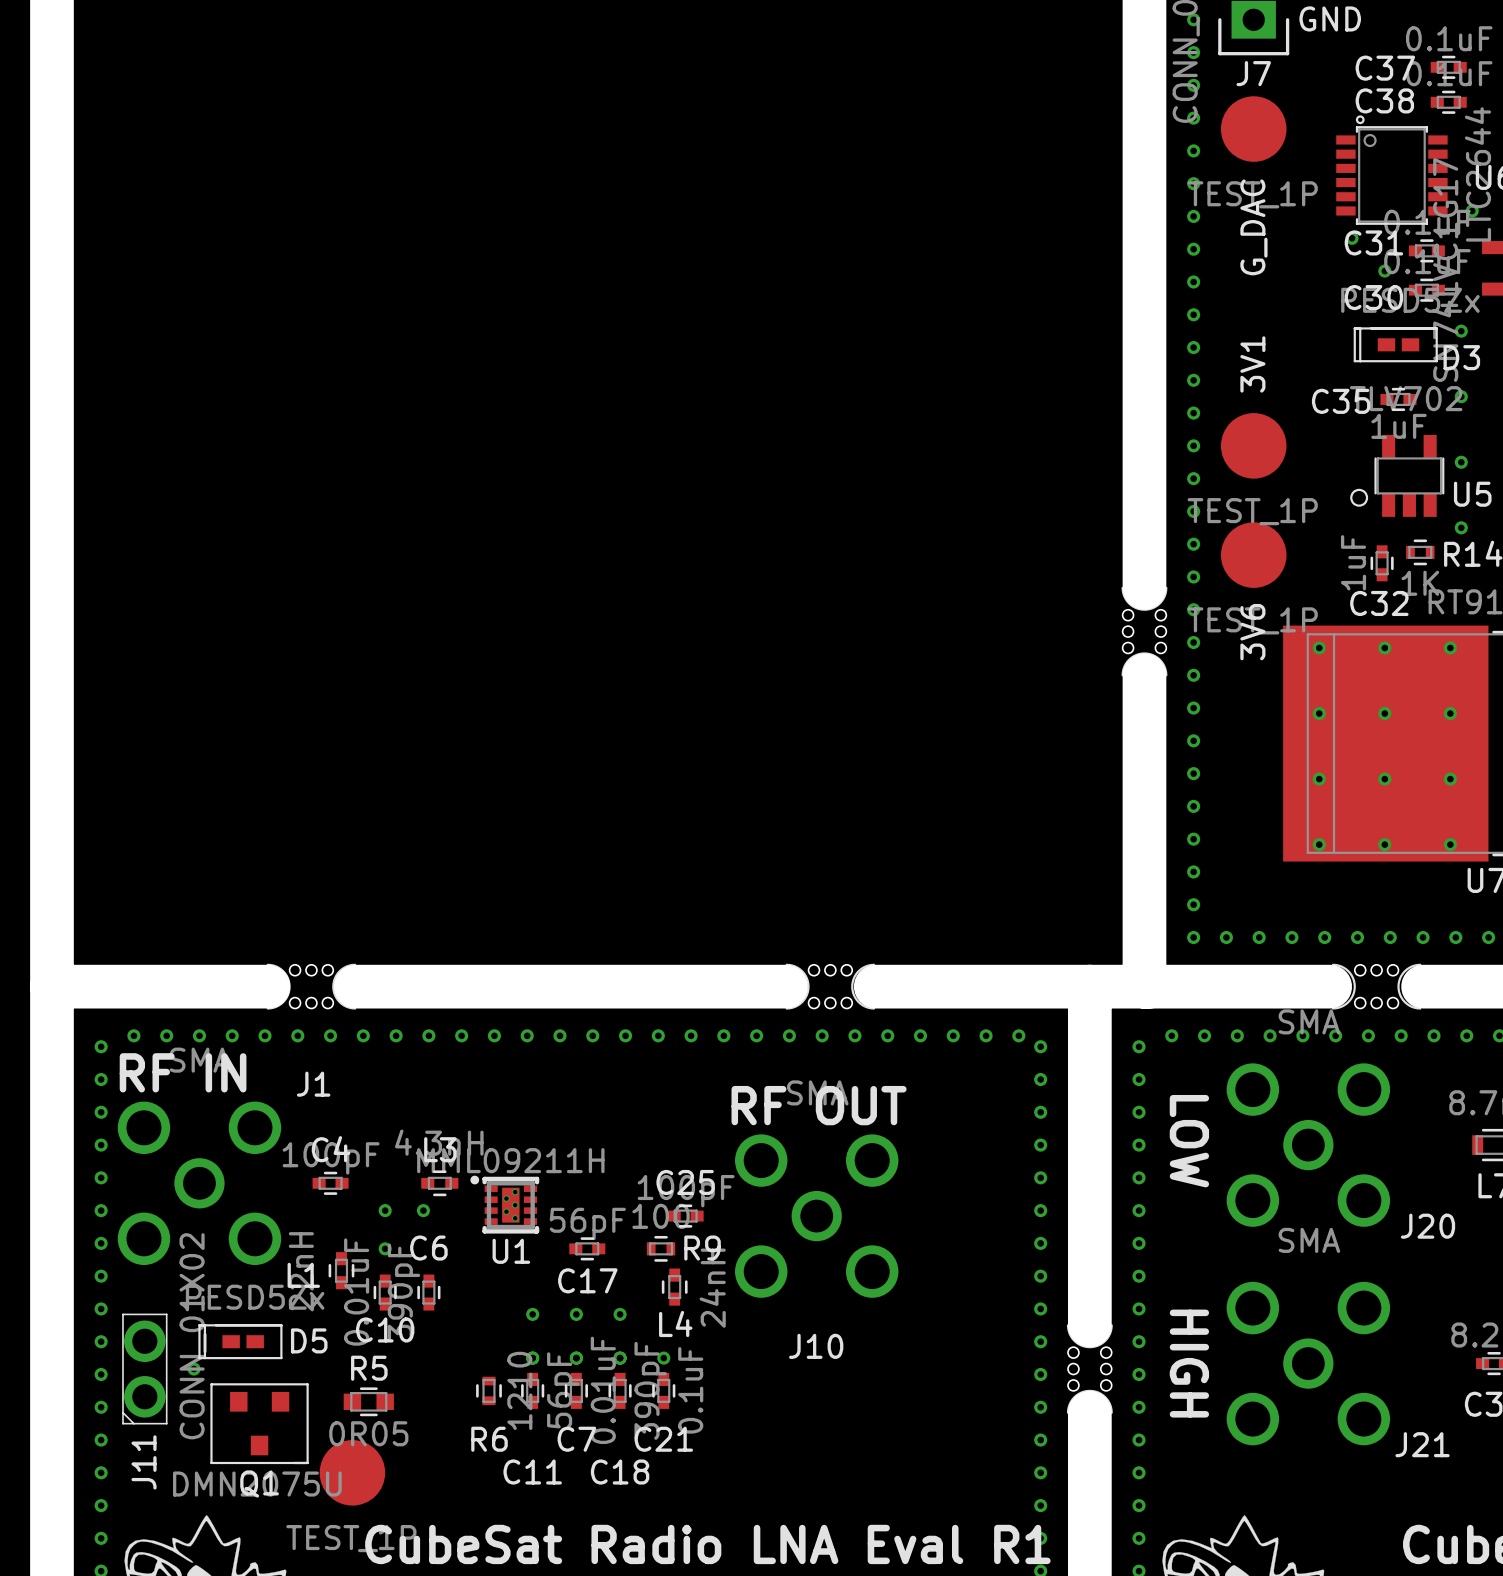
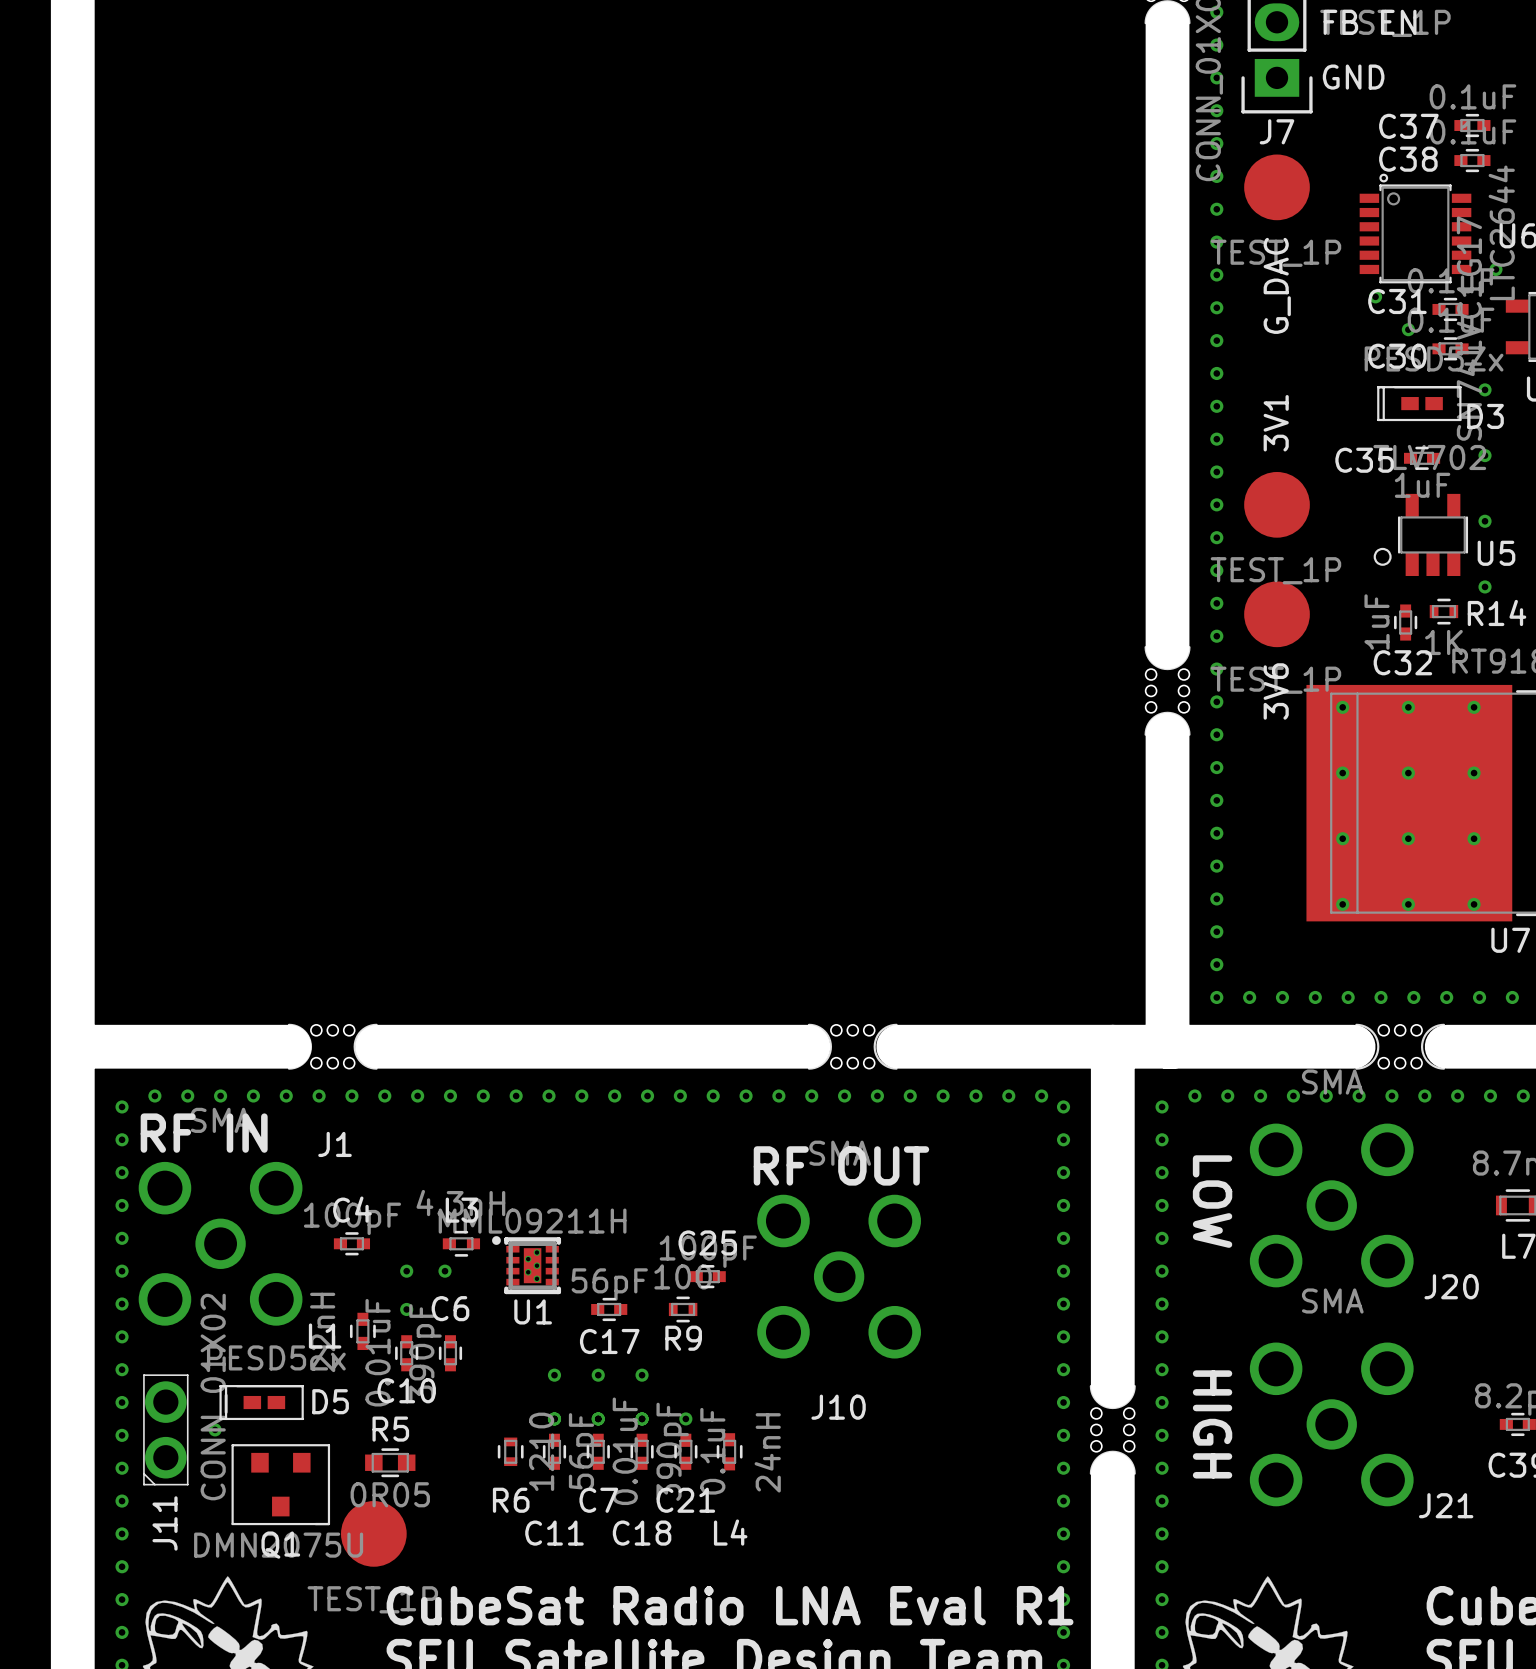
R9 name position: R9 (702, 1248) -> R9 (683, 1338)
L4 position: (674, 1287) -> (729, 1451)
L4 name position: L4 (675, 1323) -> L4 (730, 1532)

